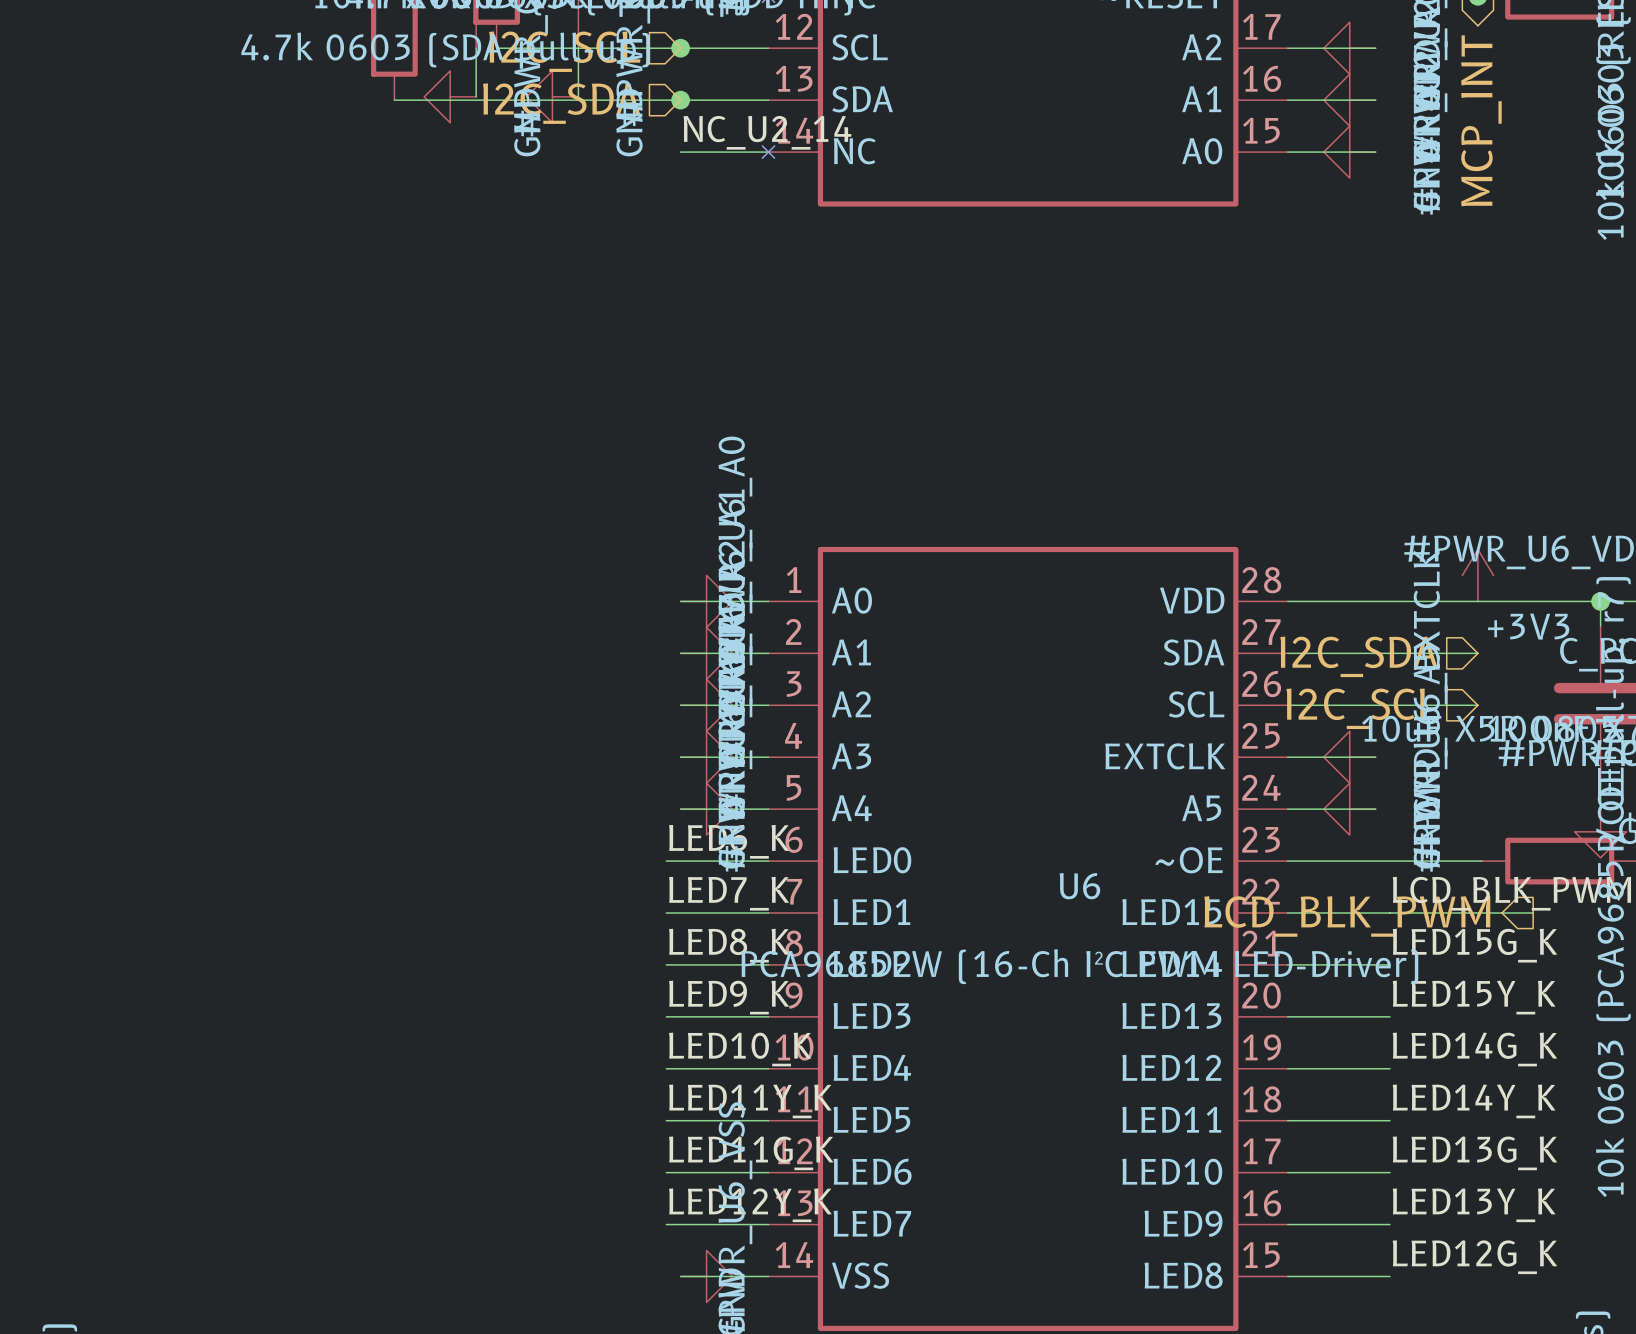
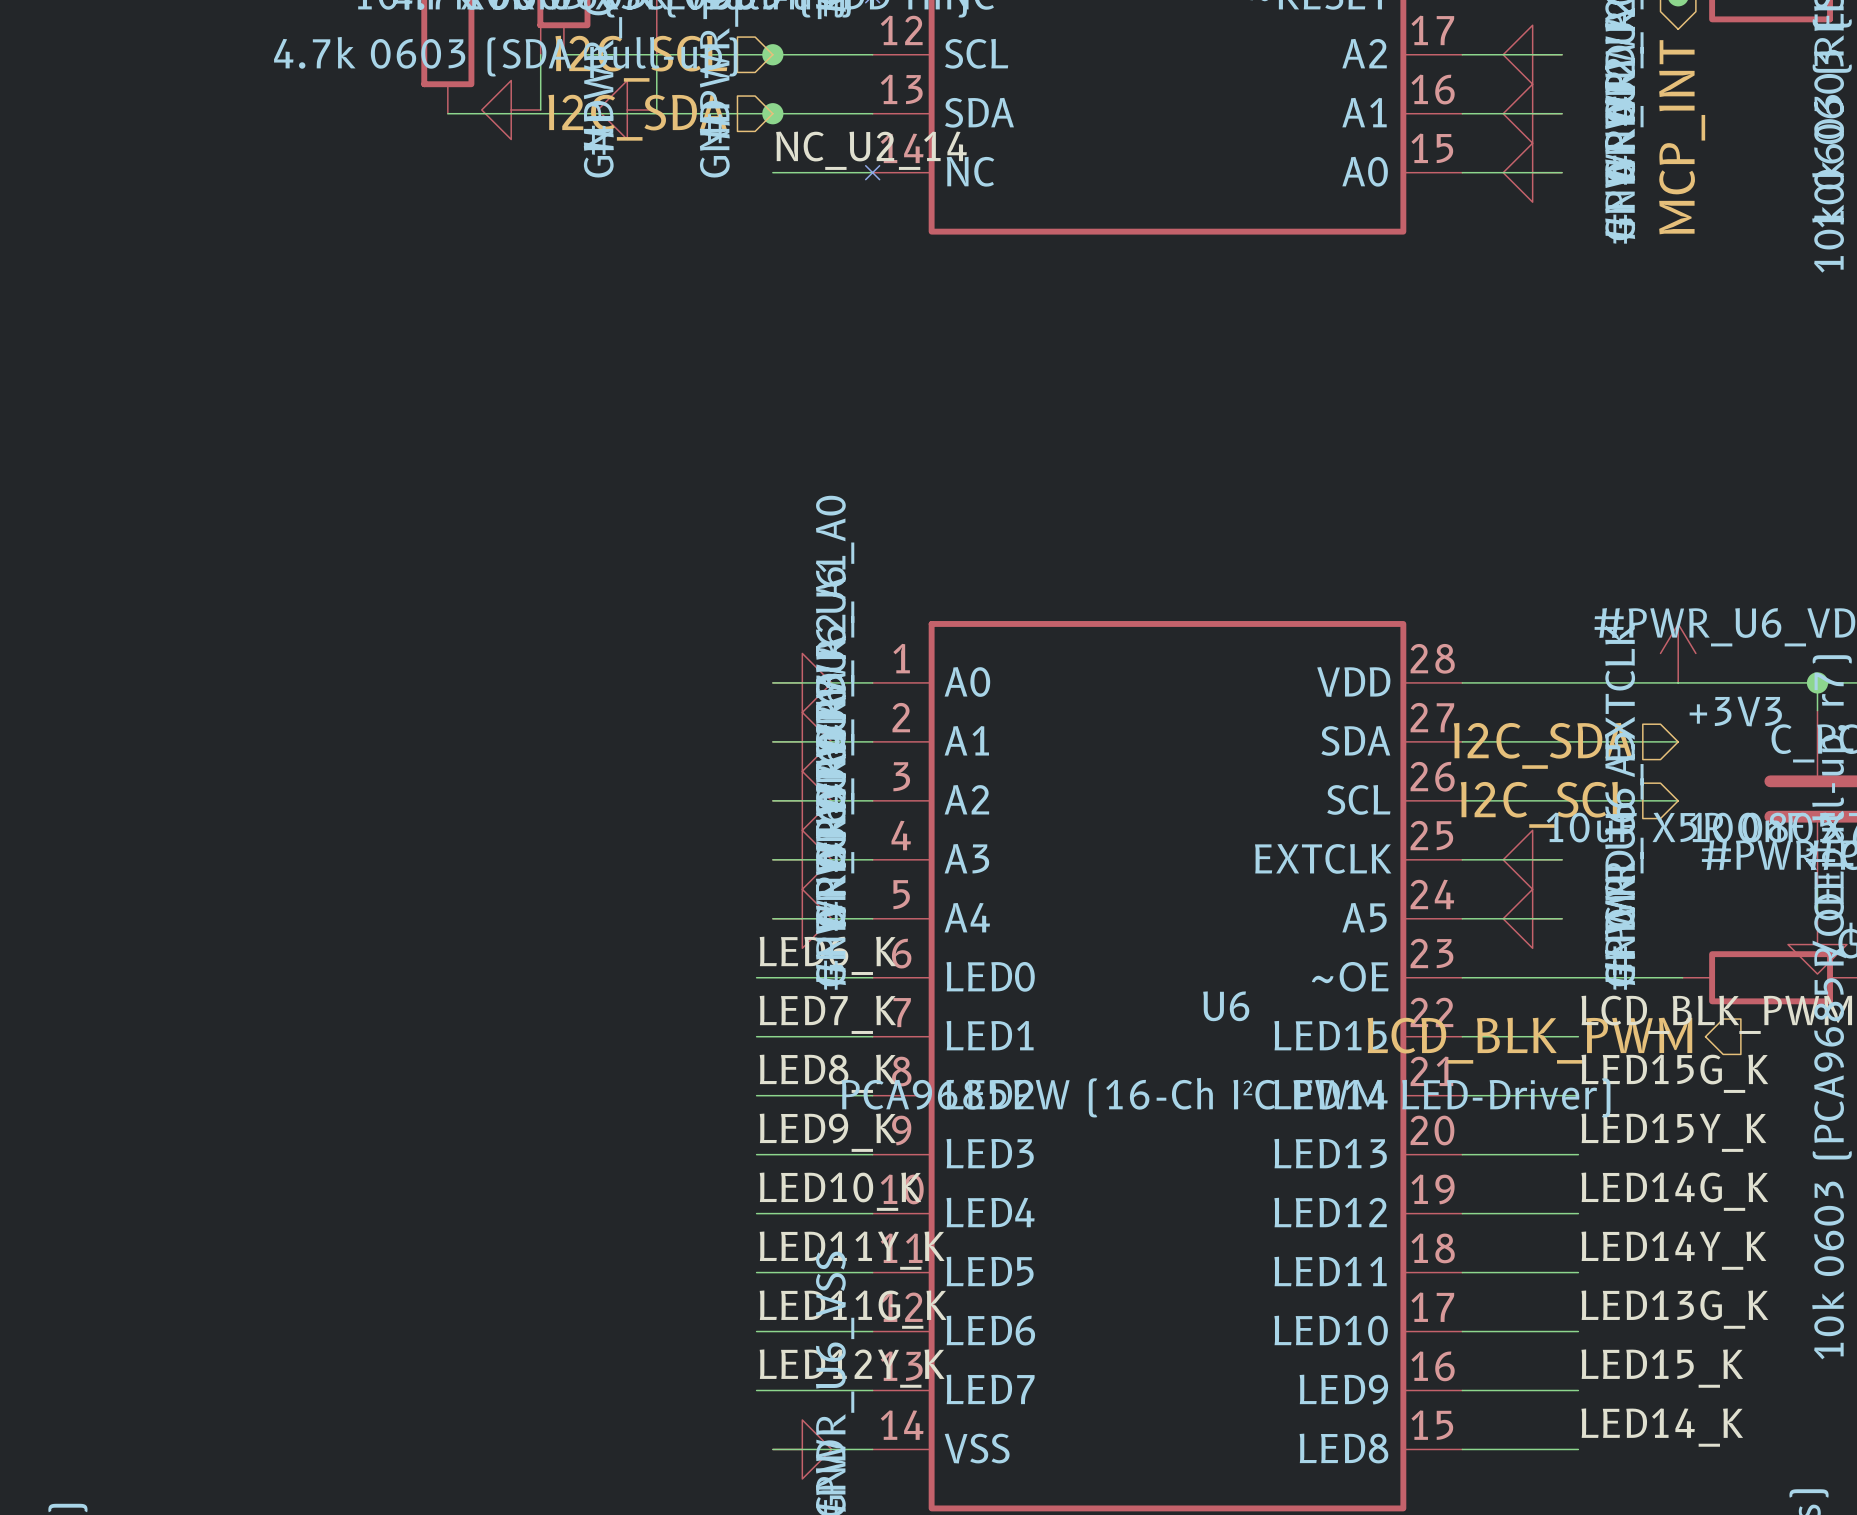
wire: (1390, 912) (1533, 912) -> none
label: LED13Y_K (1474, 1205) -> LED15_K (1662, 1368)
label: LED12G_K (1475, 1257) -> LED14_K (1662, 1427)

